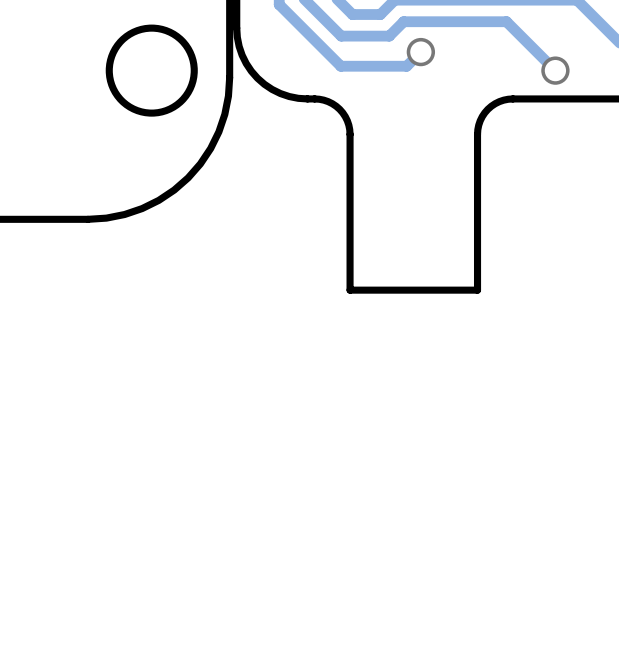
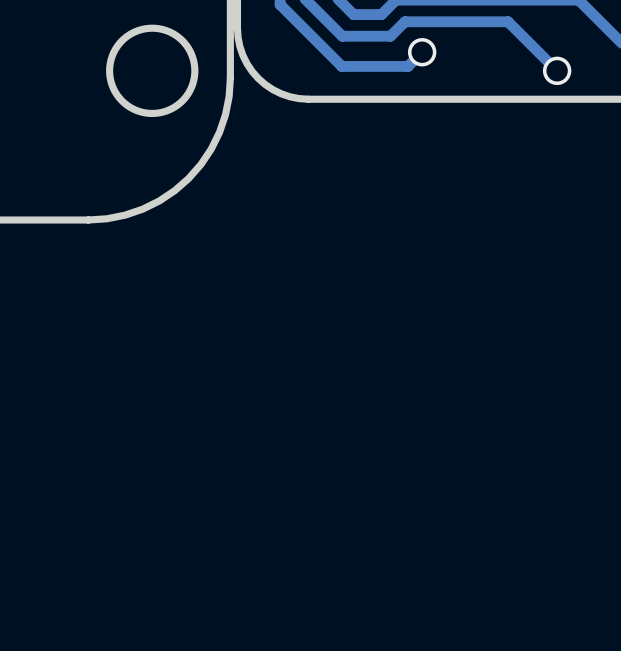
board edge: (512, 98) (503, 100) (491, 106) (482, 116) (477, 129) (477, 290) (350, 290) (349, 129) (345, 116) (336, 106) (323, 100) (314, 98) -> (514, 99) (315, 99)

